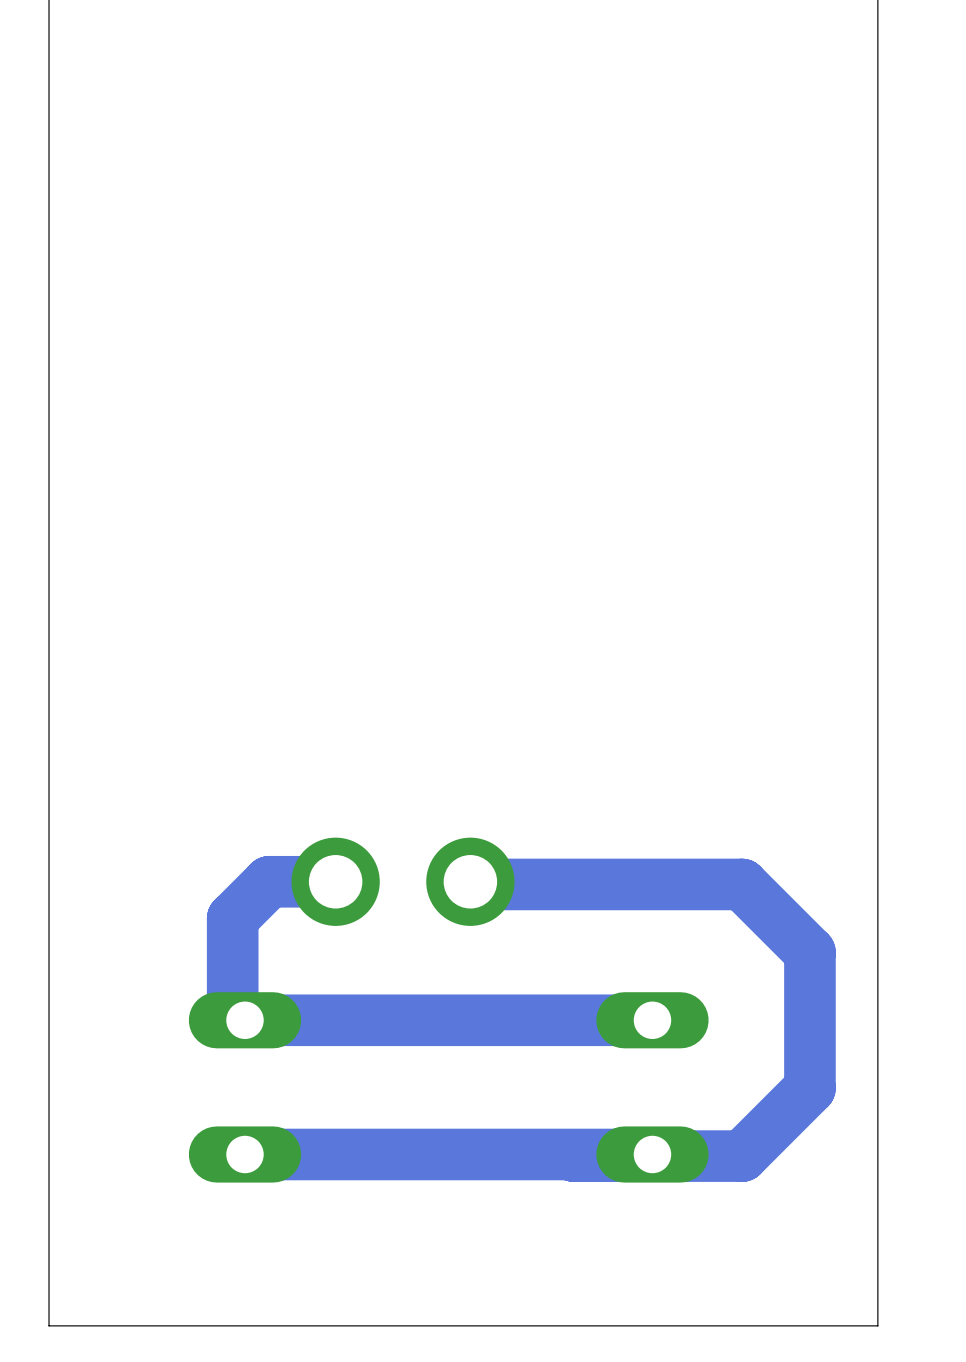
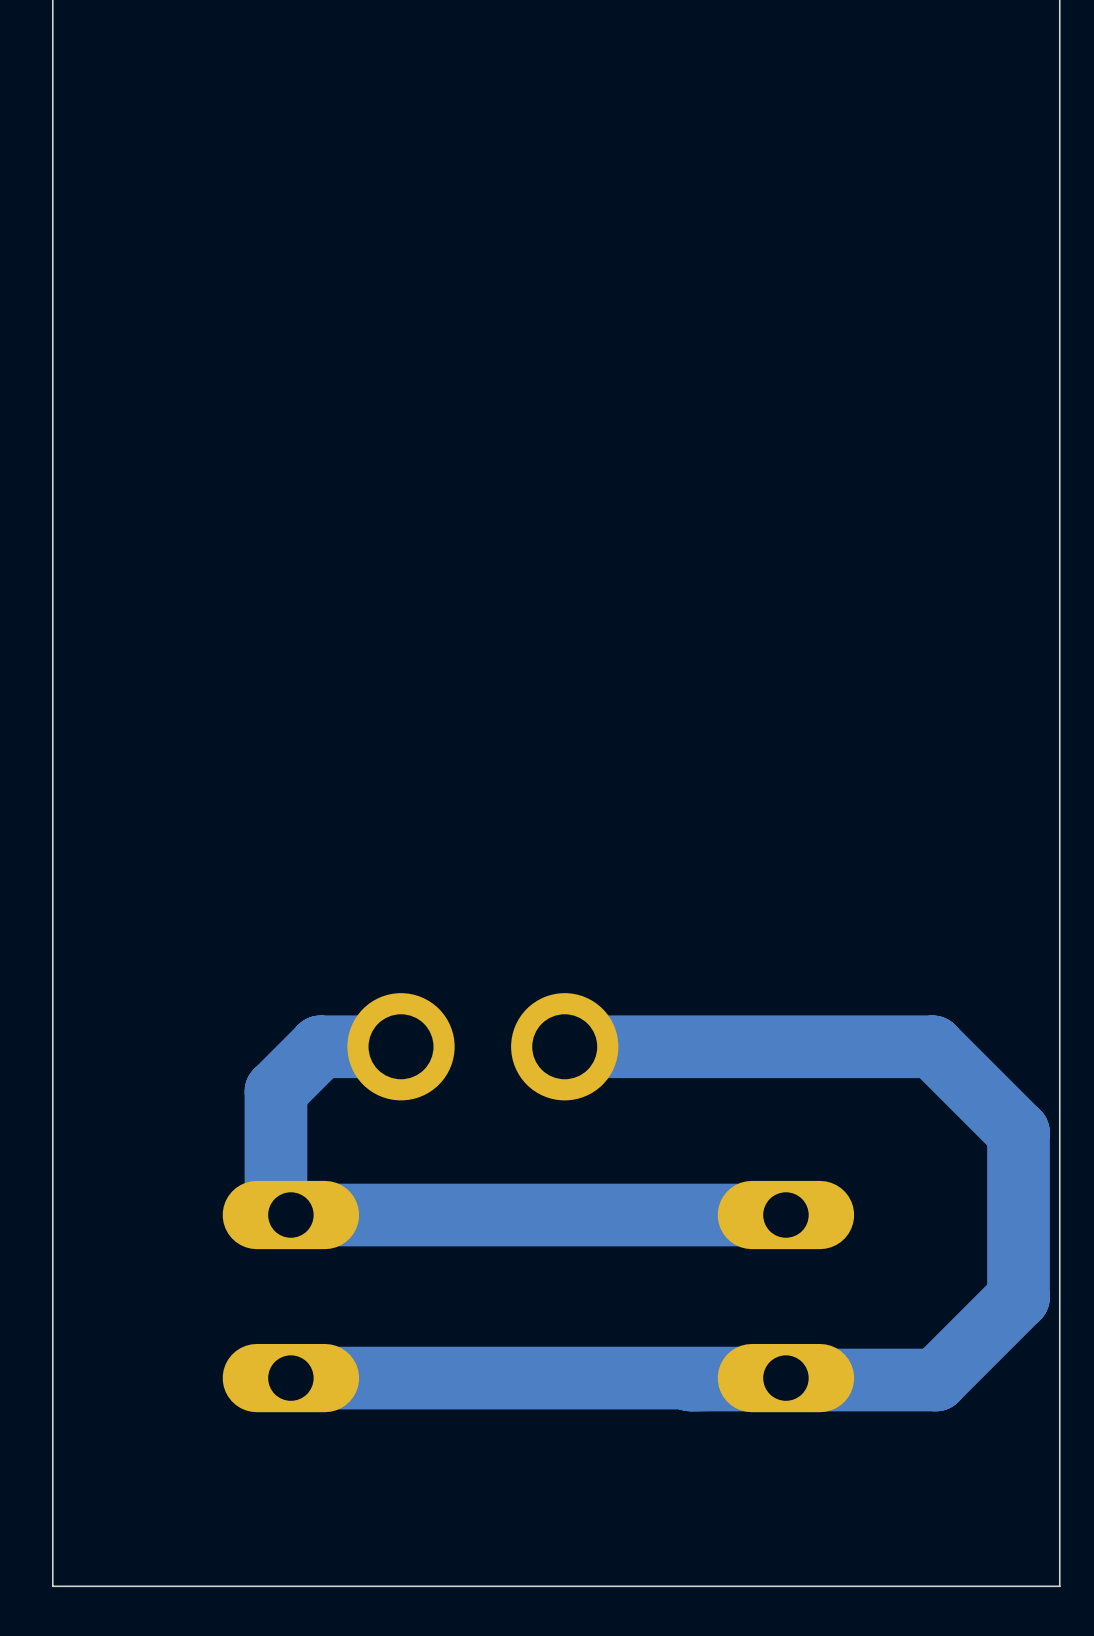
bottom track: (470, 881) (473, 884) (742, 884) (809, 952) (809, 1088) (742, 1156) -> (564, 1046) (932, 1046) (1018, 1132) (1018, 1297) (936, 1380) (894, 1380)

